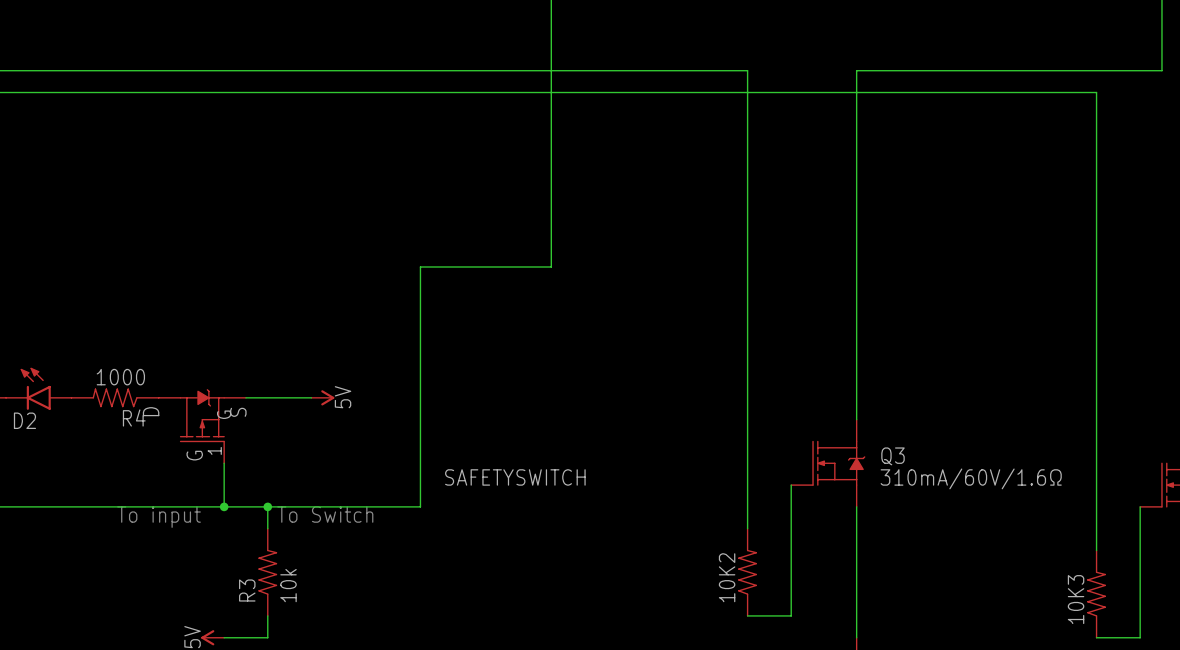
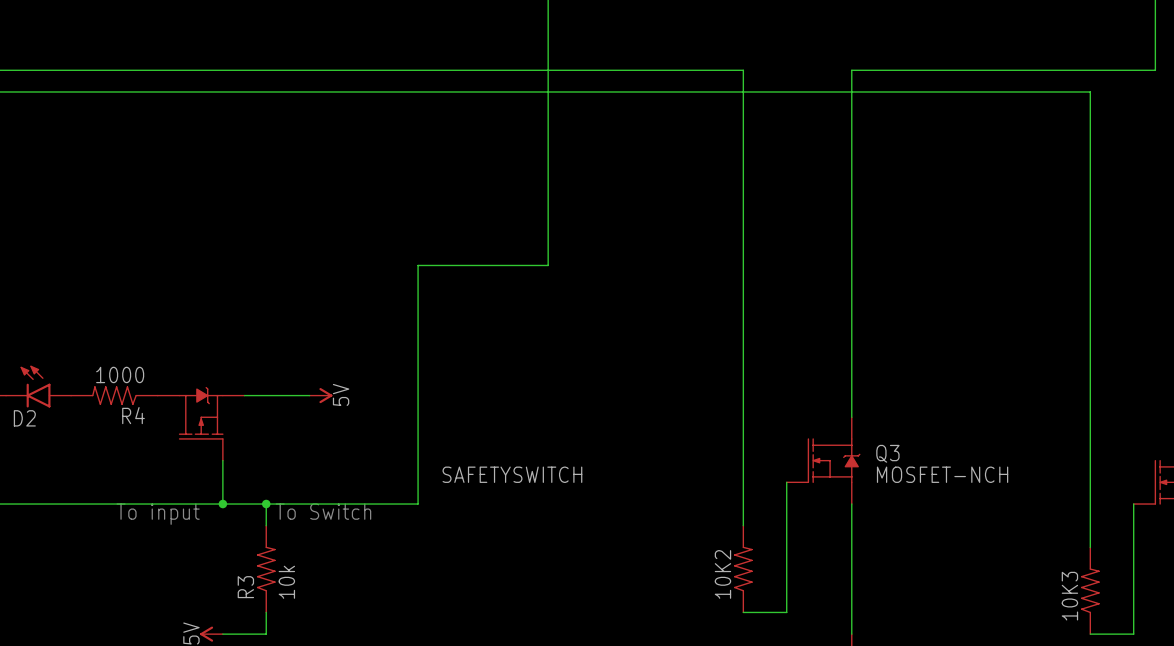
part text: D (151, 411) -> none
part text: S (238, 412) -> none
part pin name: G (224, 414) -> none
part pin number: 1 (214, 450) -> none
part text: G (194, 455) -> none
Q3 value: 310mA/60V/1.6Ω (971, 478) -> MOSFET-NCH (942, 474)

